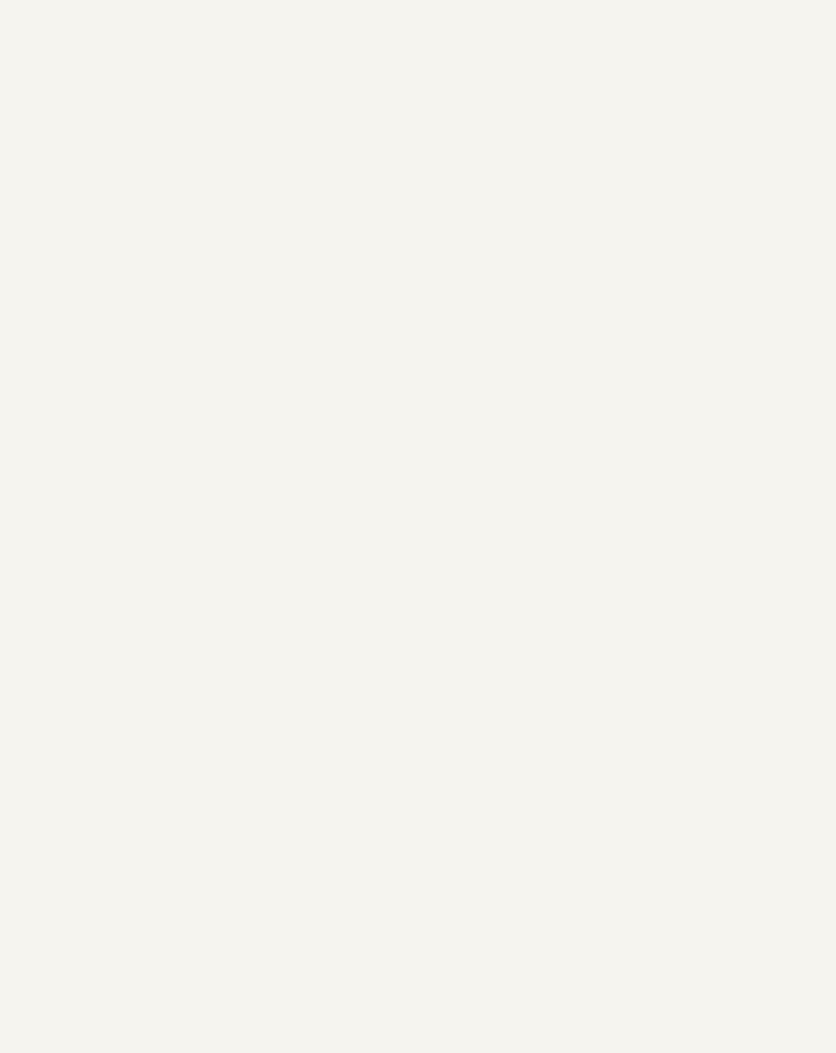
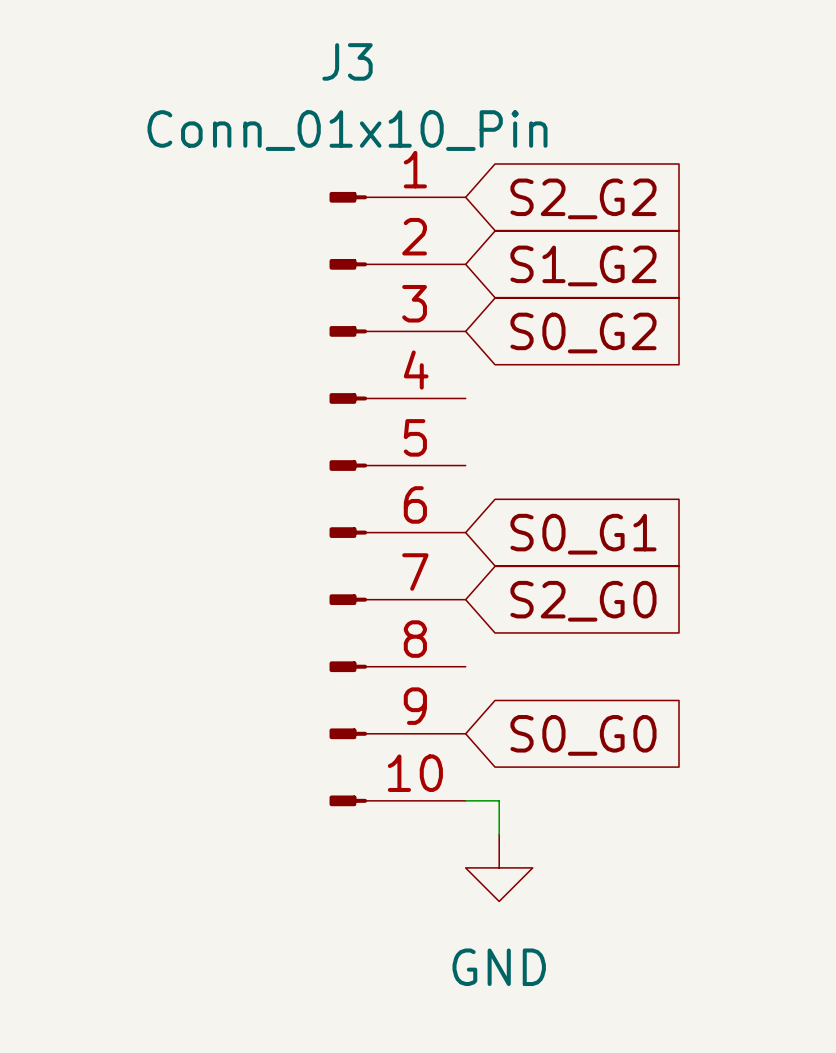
global label: none -> S2_G2 (583, 198)
global label: none -> S1_G2 (583, 265)
global label: none -> S0_G2 (583, 333)
J3: none -> Conn_01x10_Pin (397, 499)
global label: none -> S0_G1 (583, 534)
global label: none -> S2_G0 (583, 601)
global label: none -> S0_G0 (583, 735)
wire: none -> (465, 800) (499, 800) (499, 834)
power symbol: none -> GND (499, 867)

